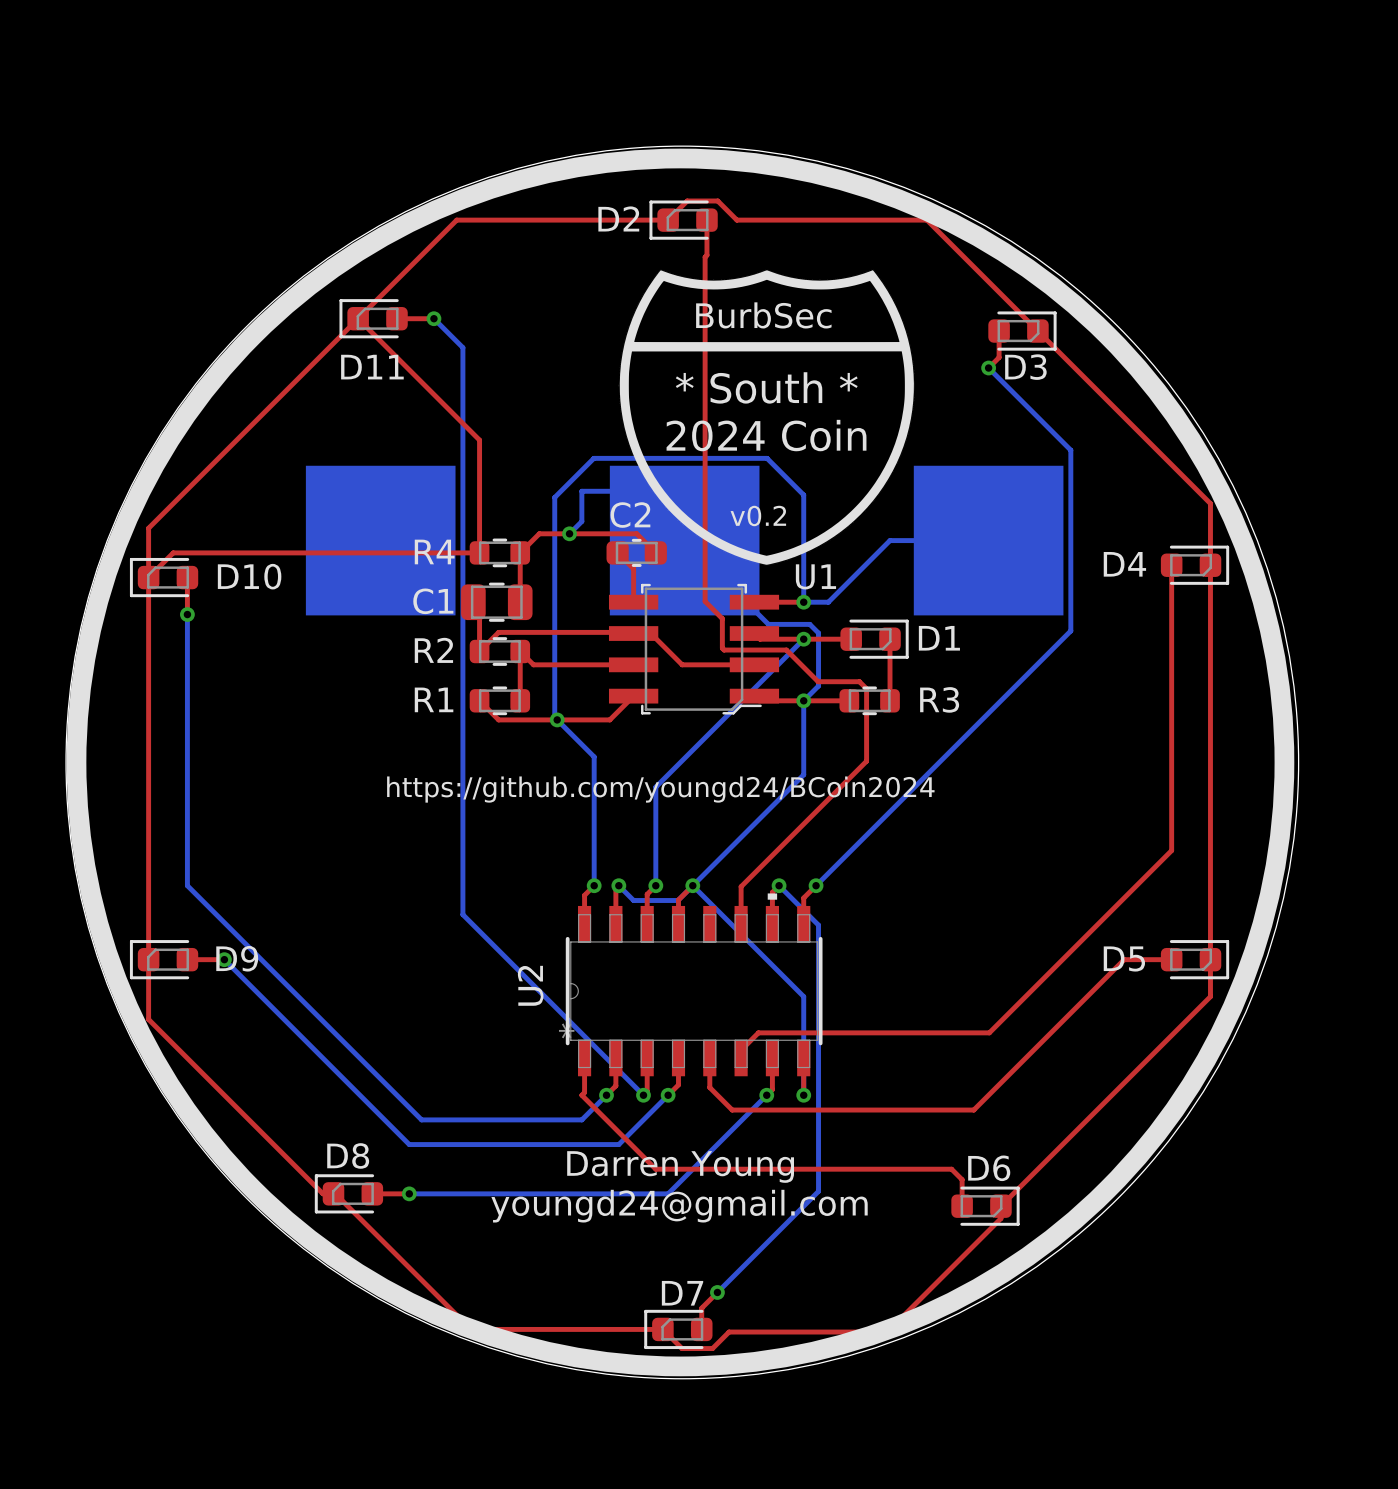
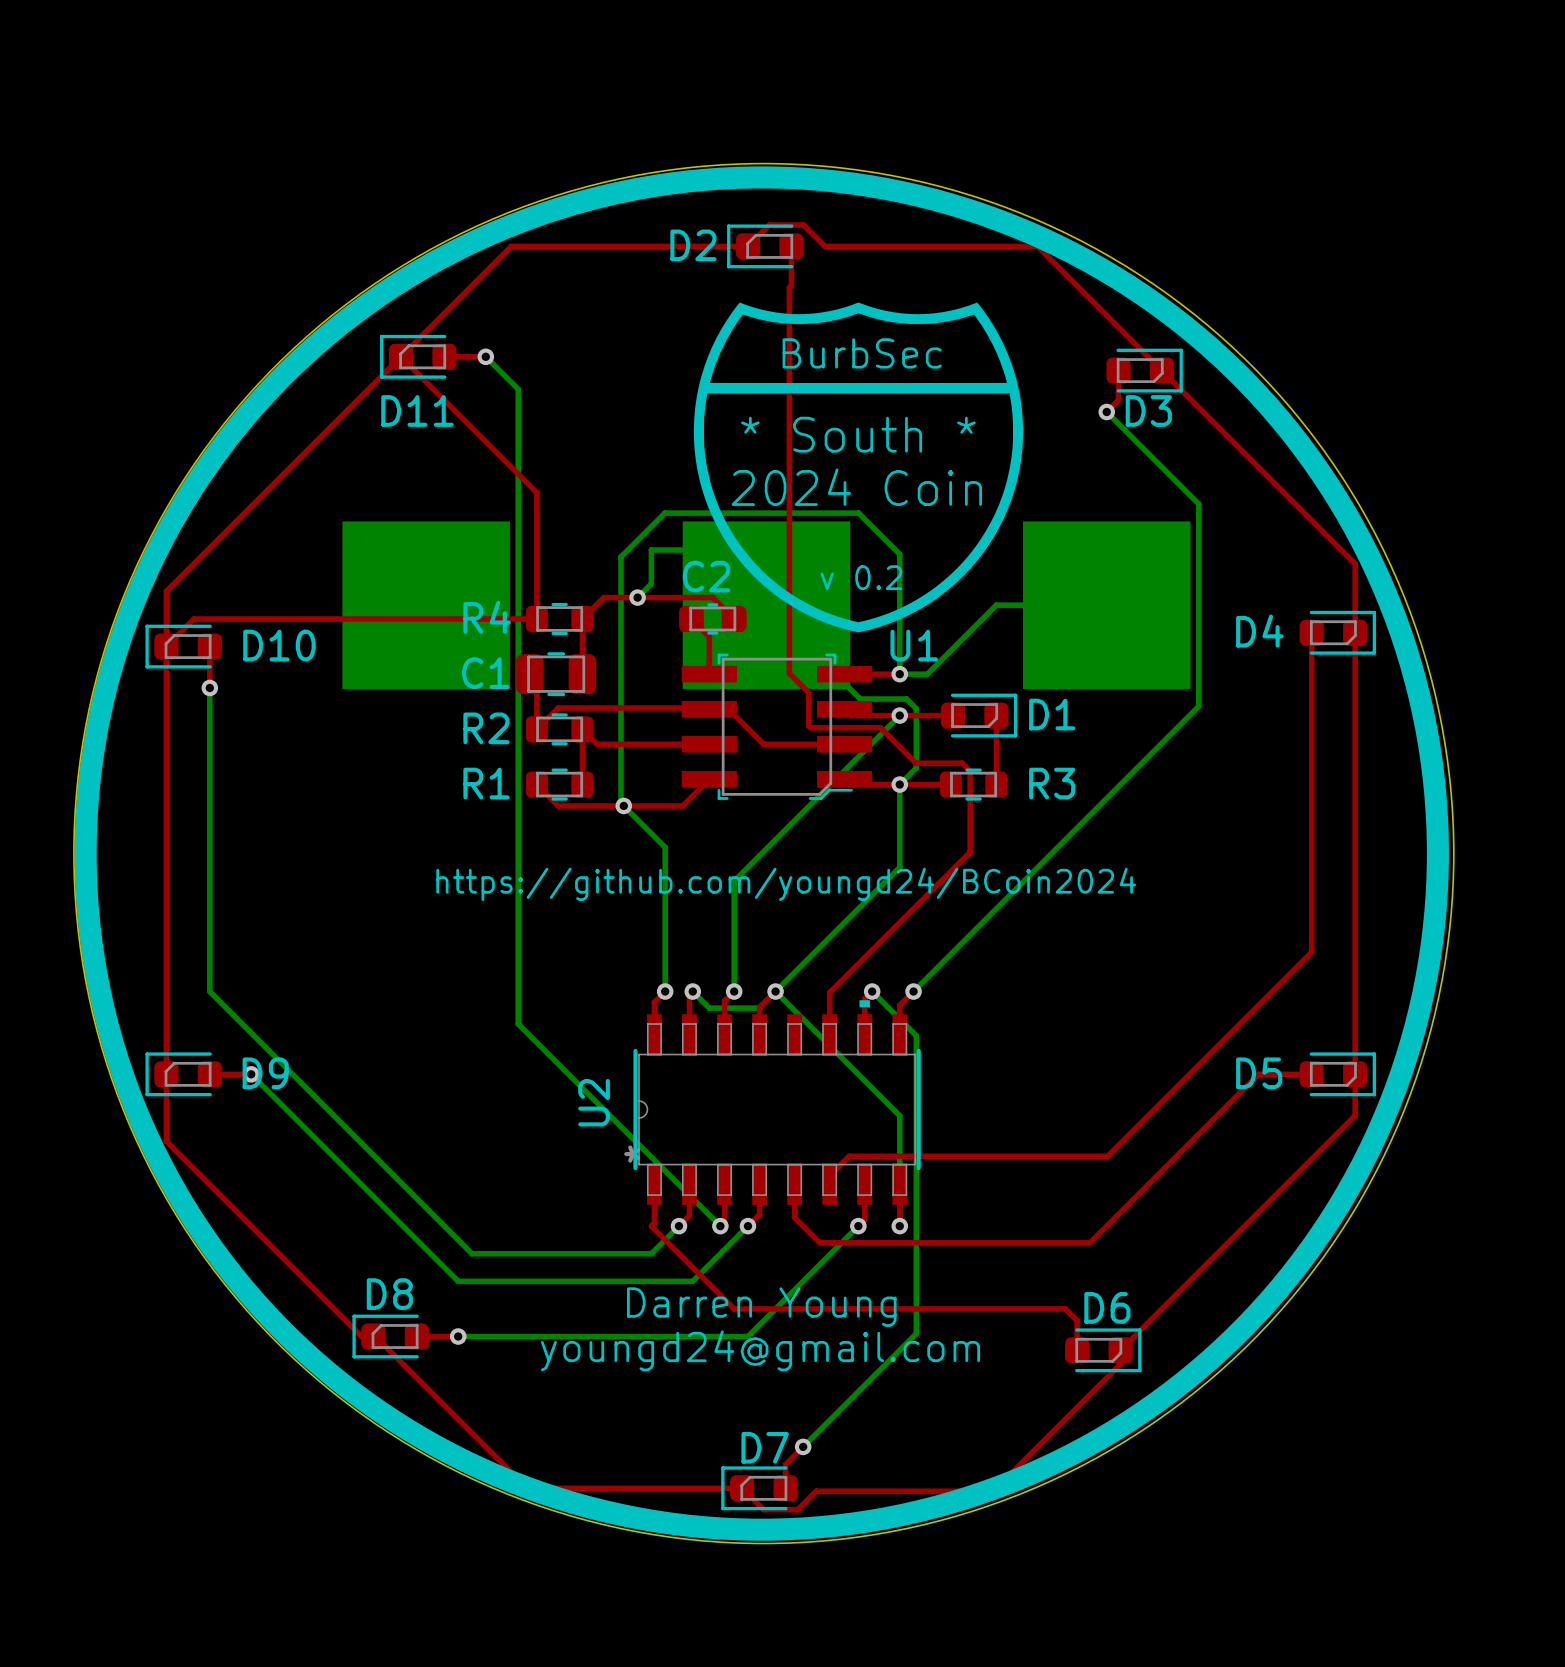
text: v0.2 (758, 516) -> v 0.2 (861, 577)

